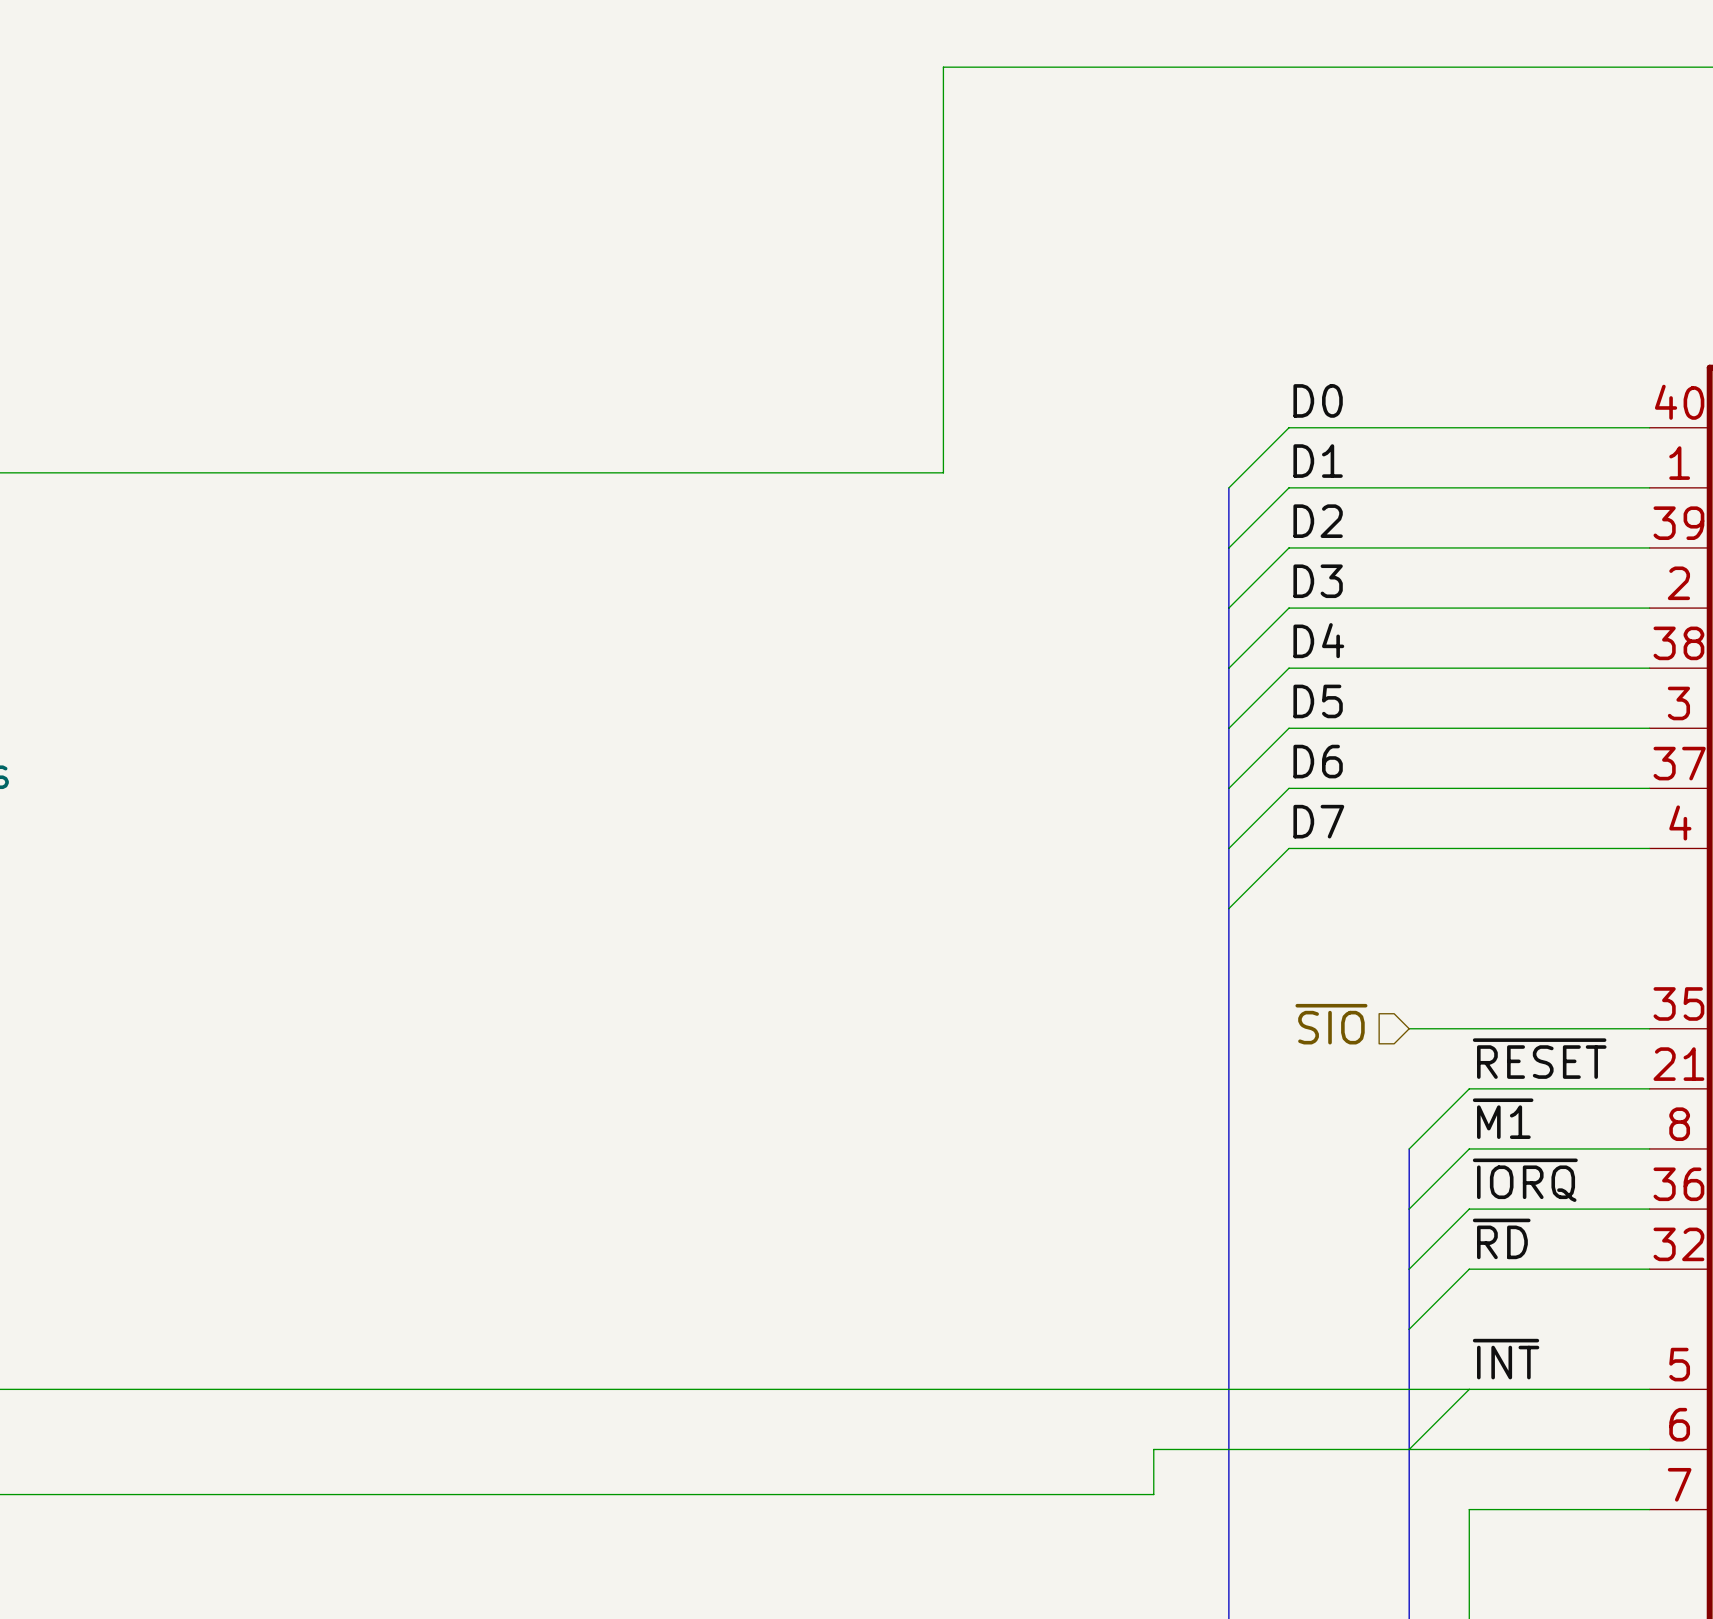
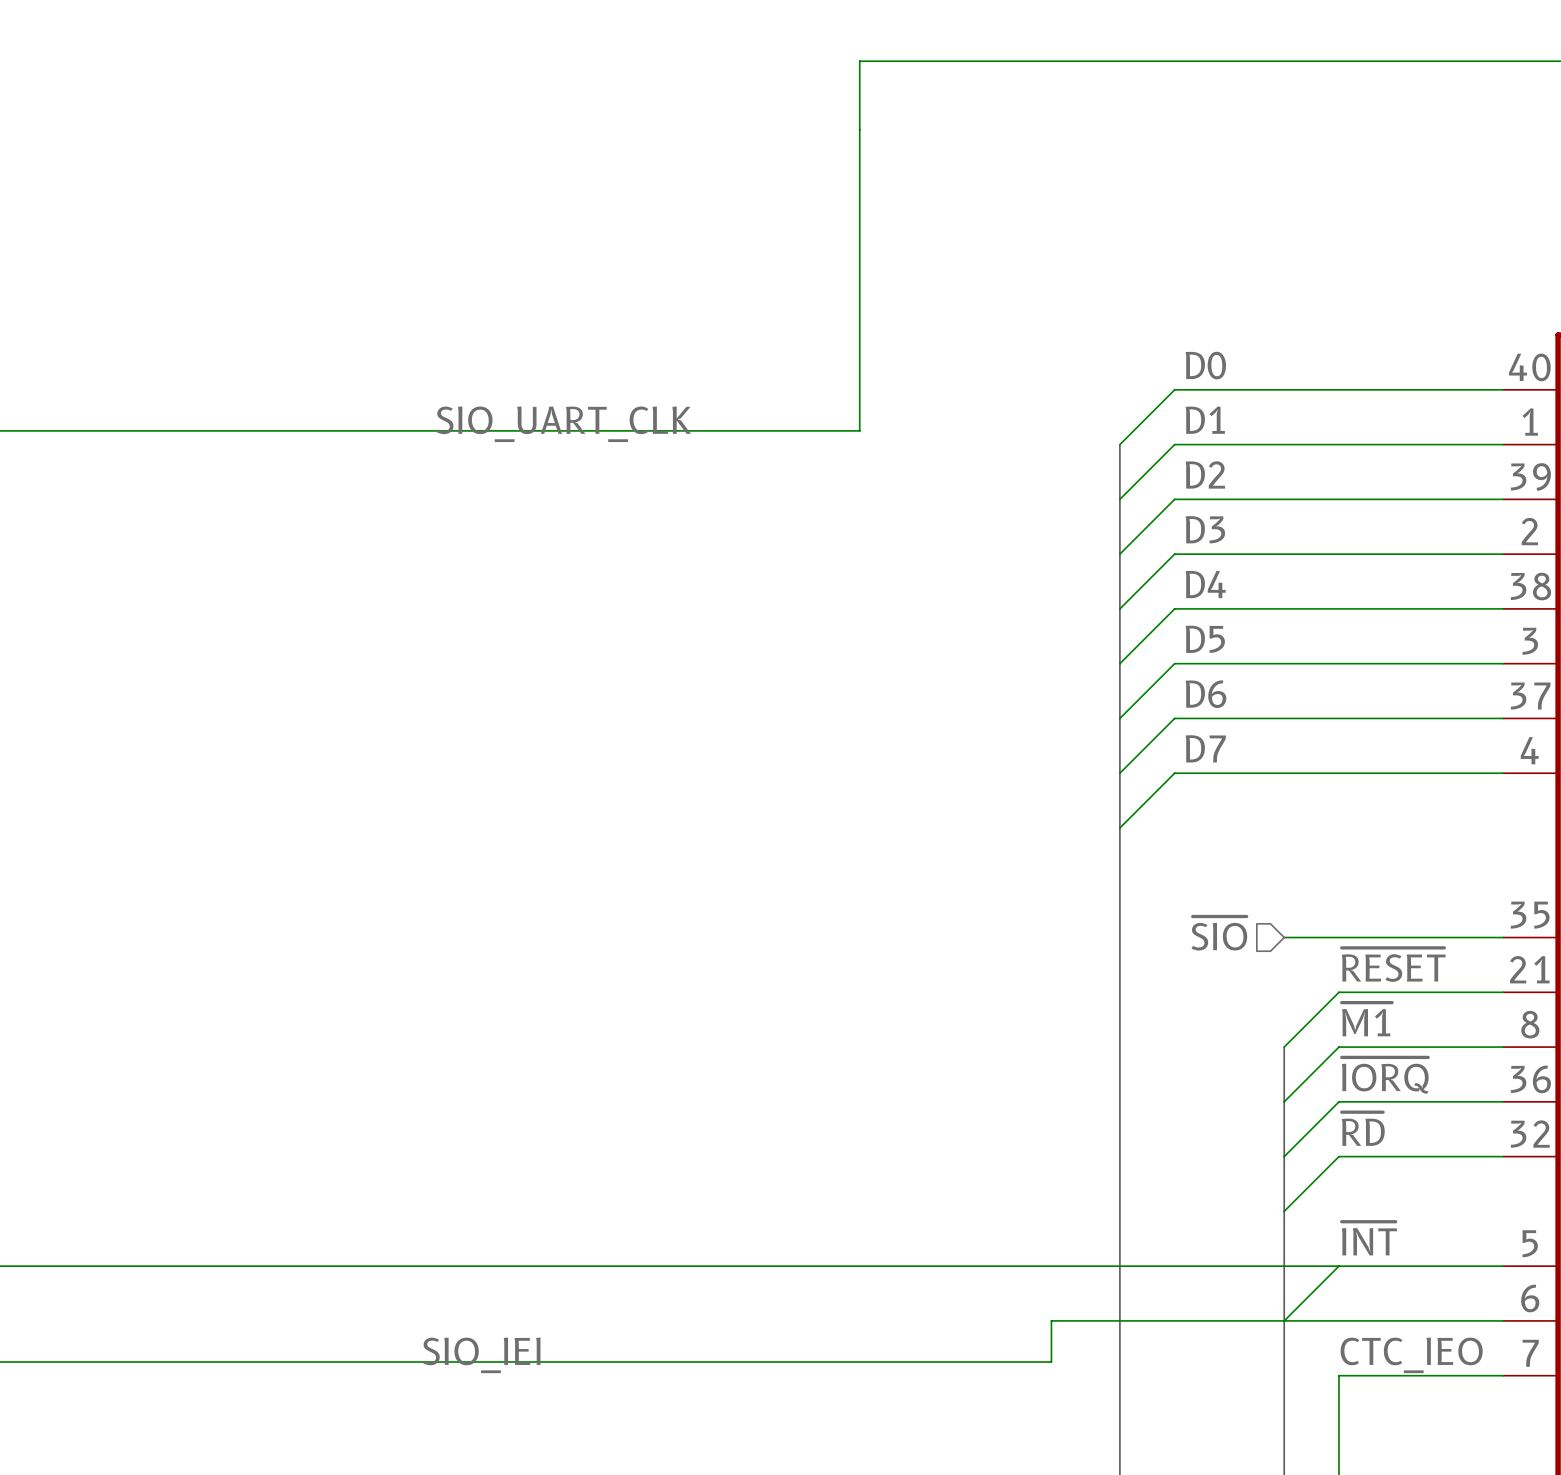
label: none -> SIO_UART_CLK (563, 424)
label: none -> SIO_IEI (481, 1355)
label: none -> CTC_IEO (1411, 1355)

